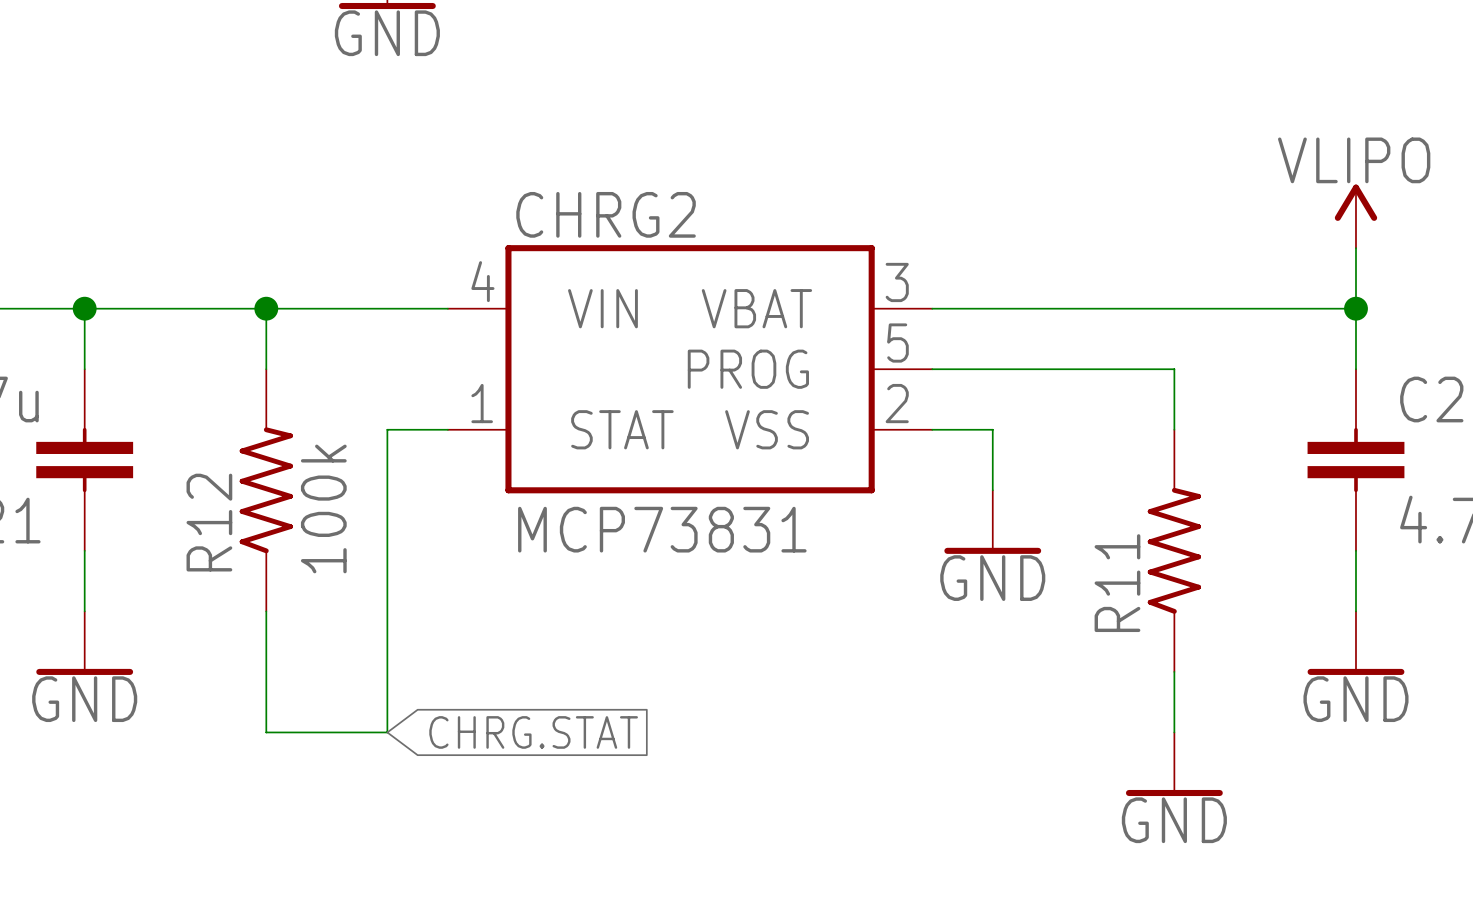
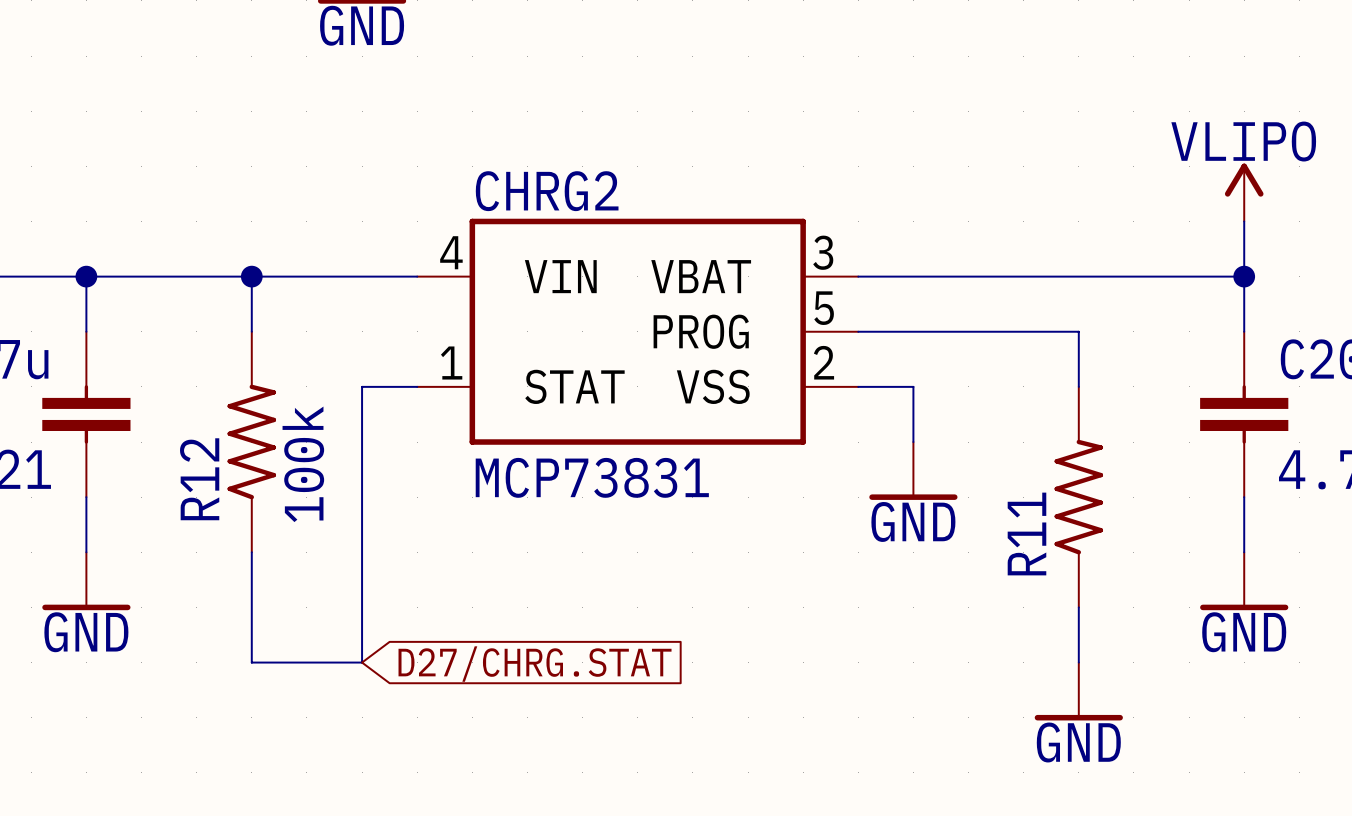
global label: CHRG.STAT (533, 732) -> D27/CHRG.STAT (535, 664)

